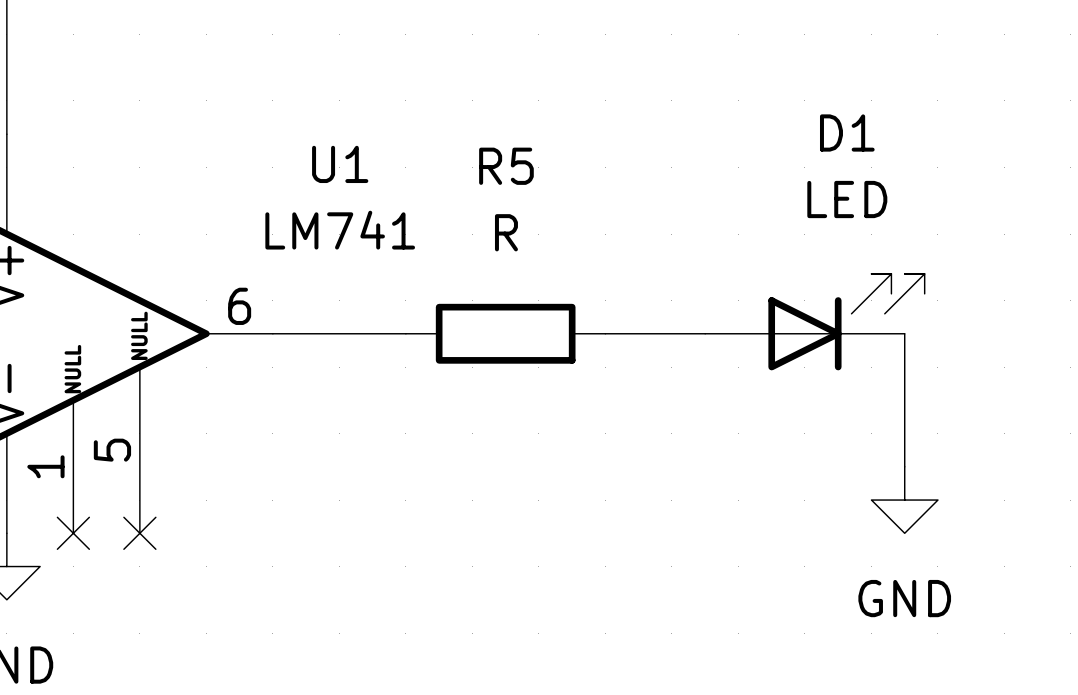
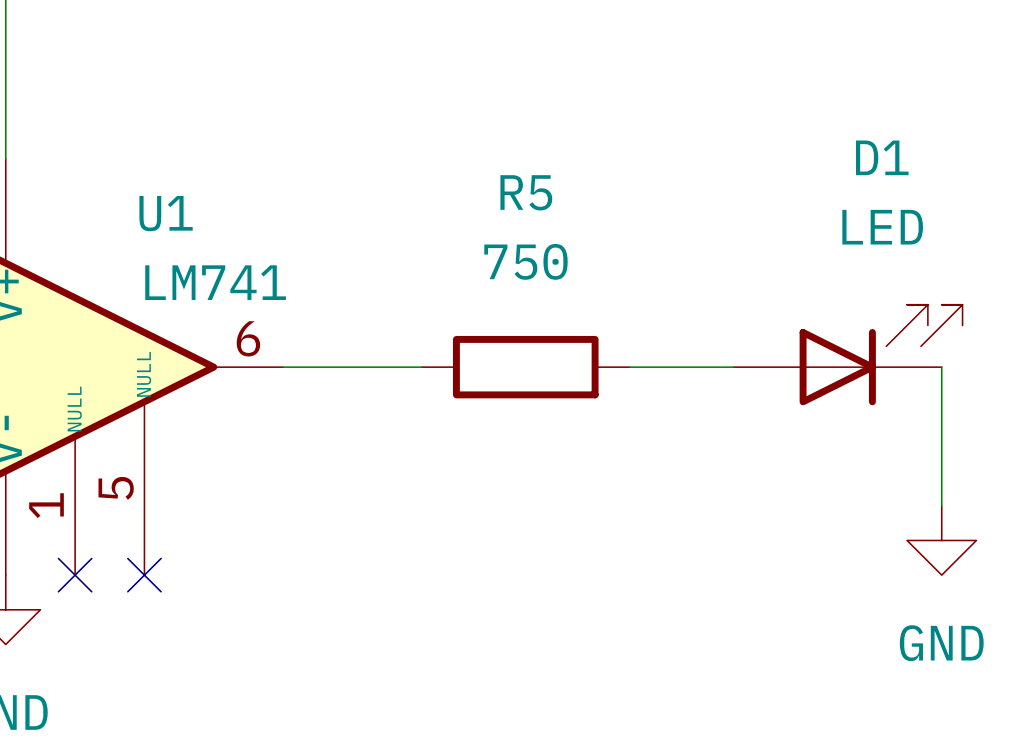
U1 name position: U1 (340, 164) -> U1 (166, 213)
U1 value position: LM741 (340, 230) -> LM741 (215, 282)
R5 value: R (506, 232) -> 750 (525, 261)

